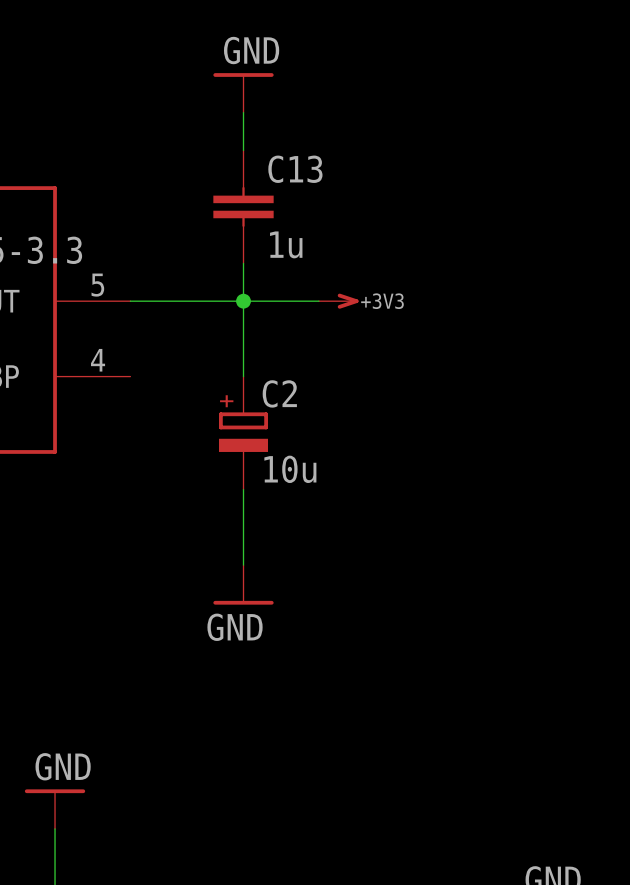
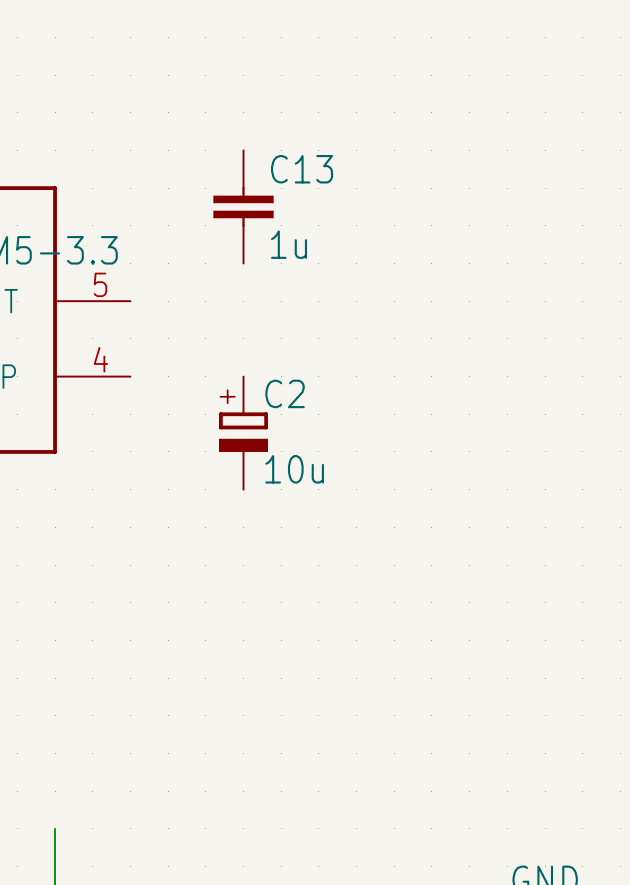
power symbol: GND (243, 92) -> none
wire: (243, 112) (243, 150) -> none
wire: (243, 263) (243, 376) -> none
wire: (130, 301) (318, 301) -> none
junction: (243, 301) -> none
power symbol: +3V3 (338, 301) -> none
wire: (243, 489) (243, 565) -> none
power symbol: GND (243, 584) -> none
power symbol: GND (55, 809) -> none

